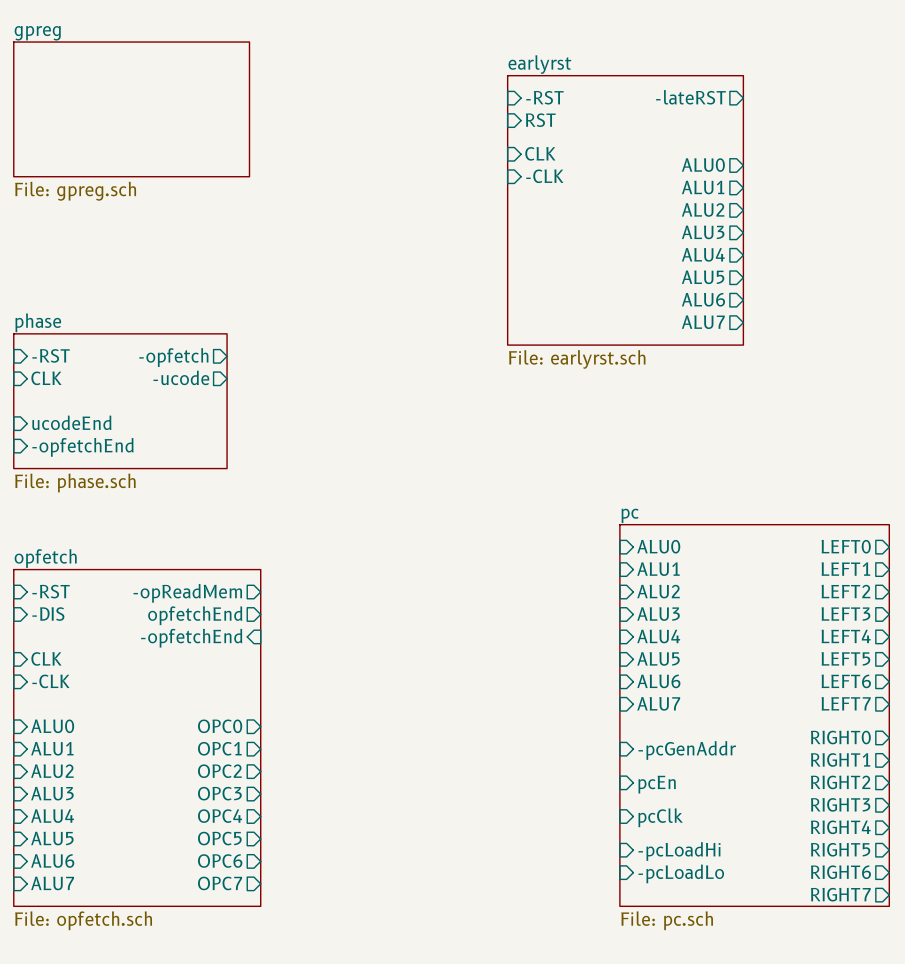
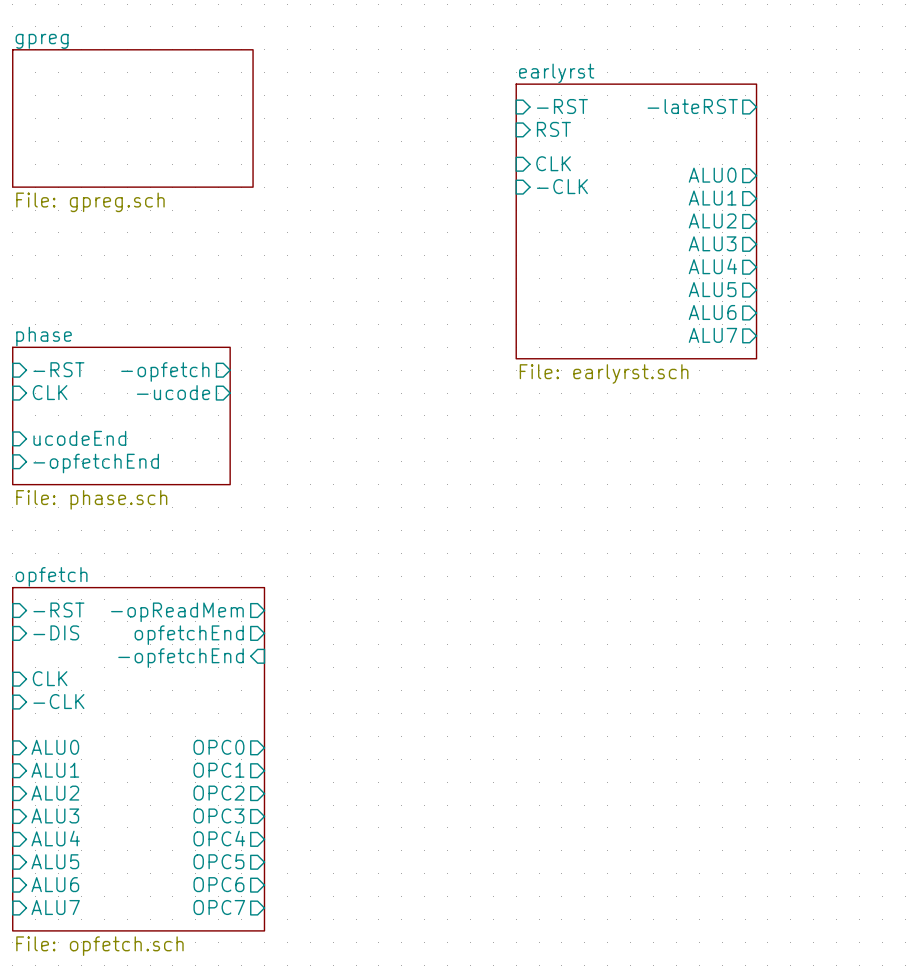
sheet pin: ALU0 (658, 546) -> none
sheet pin: LEFT0 (846, 546) -> none
sheet pin: ALU1 (658, 569) -> none
sheet pin: LEFT1 (845, 569) -> none
sheet pin: ALU2 (658, 591) -> none
sheet pin: LEFT2 (845, 591) -> none
sheet pin: LEFT3 (845, 613) -> none
sheet pin: ALU3 (658, 614) -> none
sheet pin: ALU4 (658, 636) -> none
sheet pin: LEFT4 (846, 636) -> none
sheet pin: ALU5 (658, 658) -> none
sheet pin: LEFT5 (845, 658) -> none
sheet pin: ALU6 (658, 681) -> none
sheet pin: LEFT6 (846, 681) -> none
sheet pin: ALU7 (658, 703) -> none
sheet pin: LEFT7 (846, 703) -> none
sheet pc: File: pc.sch (754, 715) -> none
sheet pin: RIGHT0 (840, 737) -> none
sheet pin: -pcGenAddr (687, 750) -> none
sheet pin: RIGHT1 (840, 759) -> none
sheet pin: RIGHT2 (840, 782) -> none
sheet pin: pcEn (657, 784) -> none
sheet pin: RIGHT3 (840, 804) -> none
sheet pin: pcClk (660, 817) -> none
sheet pin: RIGHT4 (840, 827) -> none
sheet pin: RIGHT5 (840, 849) -> none
sheet pin: -pcLoadHi (679, 851) -> none
sheet pin: RIGHT6 (840, 872) -> none
sheet pin: -pcLoadLo (681, 873) -> none
sheet pin: RIGHT7 (840, 894) -> none

